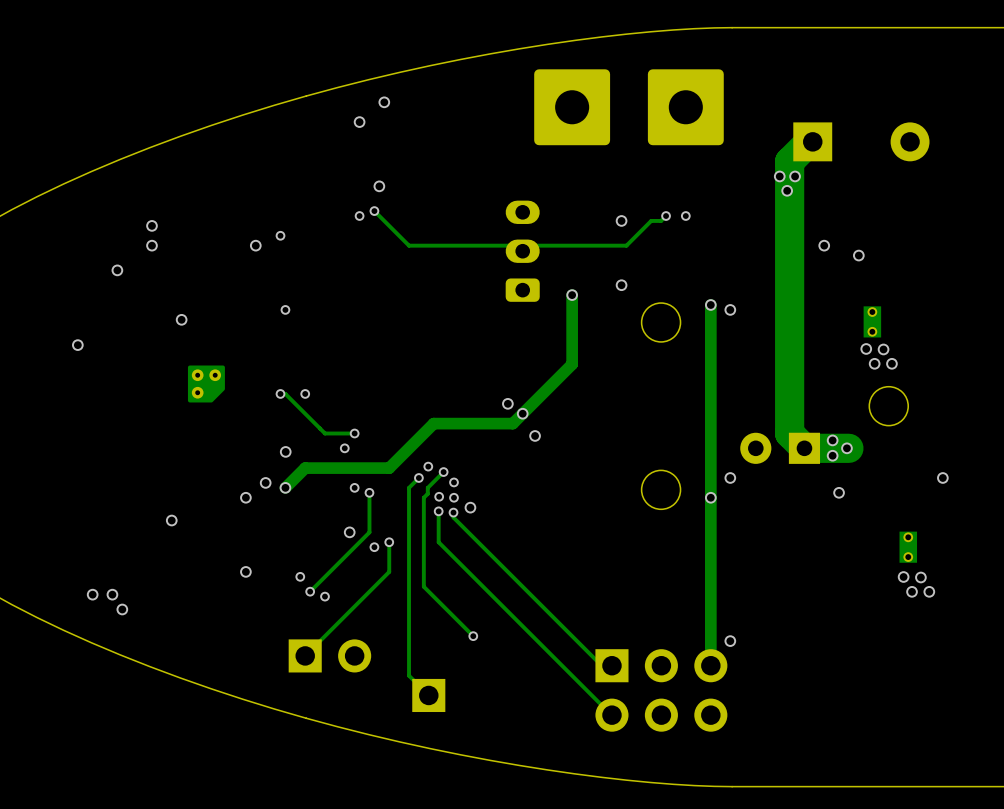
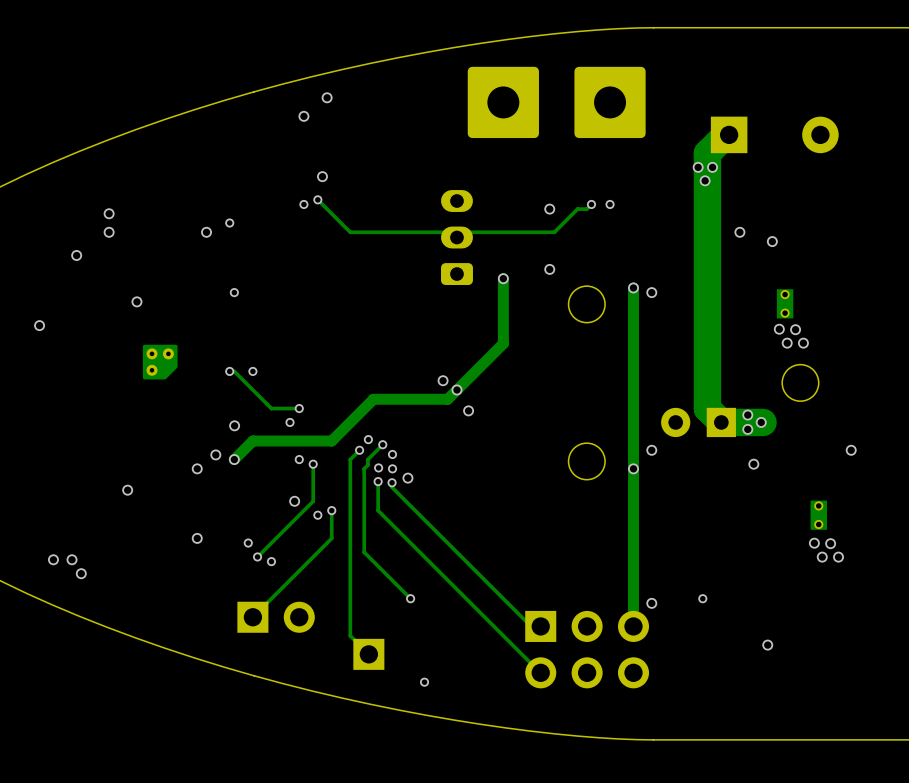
via: none -> (702, 598)
via: none -> (767, 645)
via: none -> (424, 682)

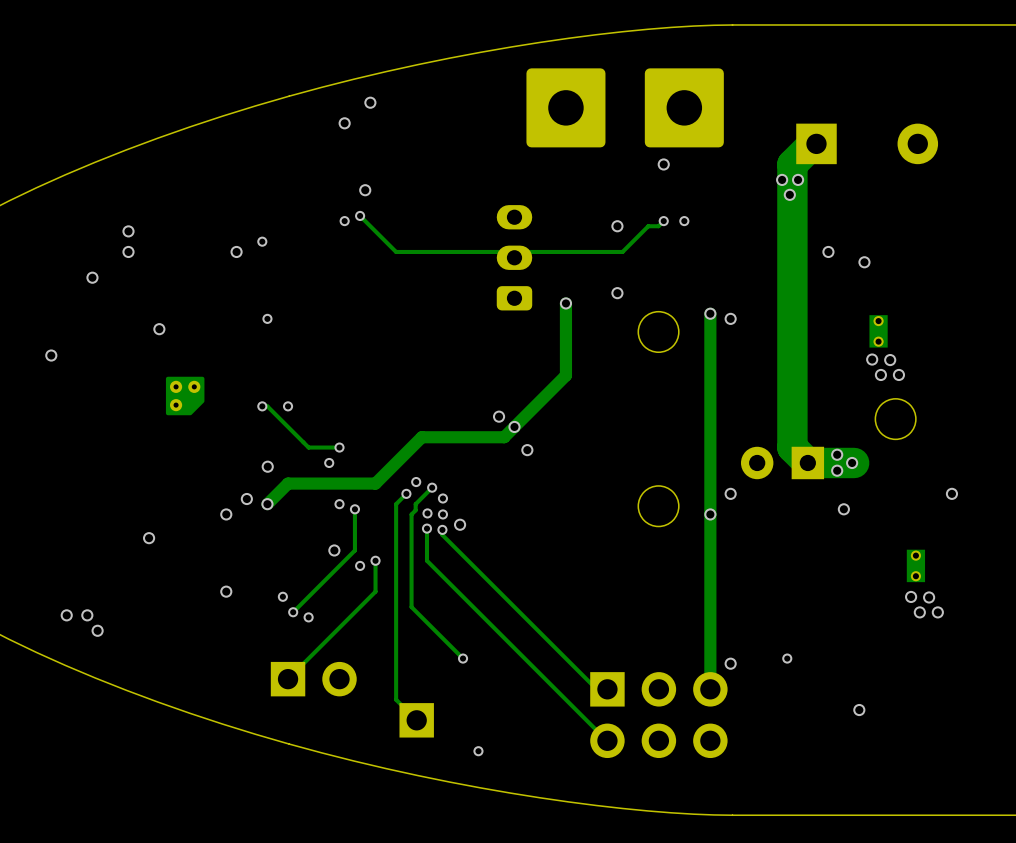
via: none -> (663, 164)

